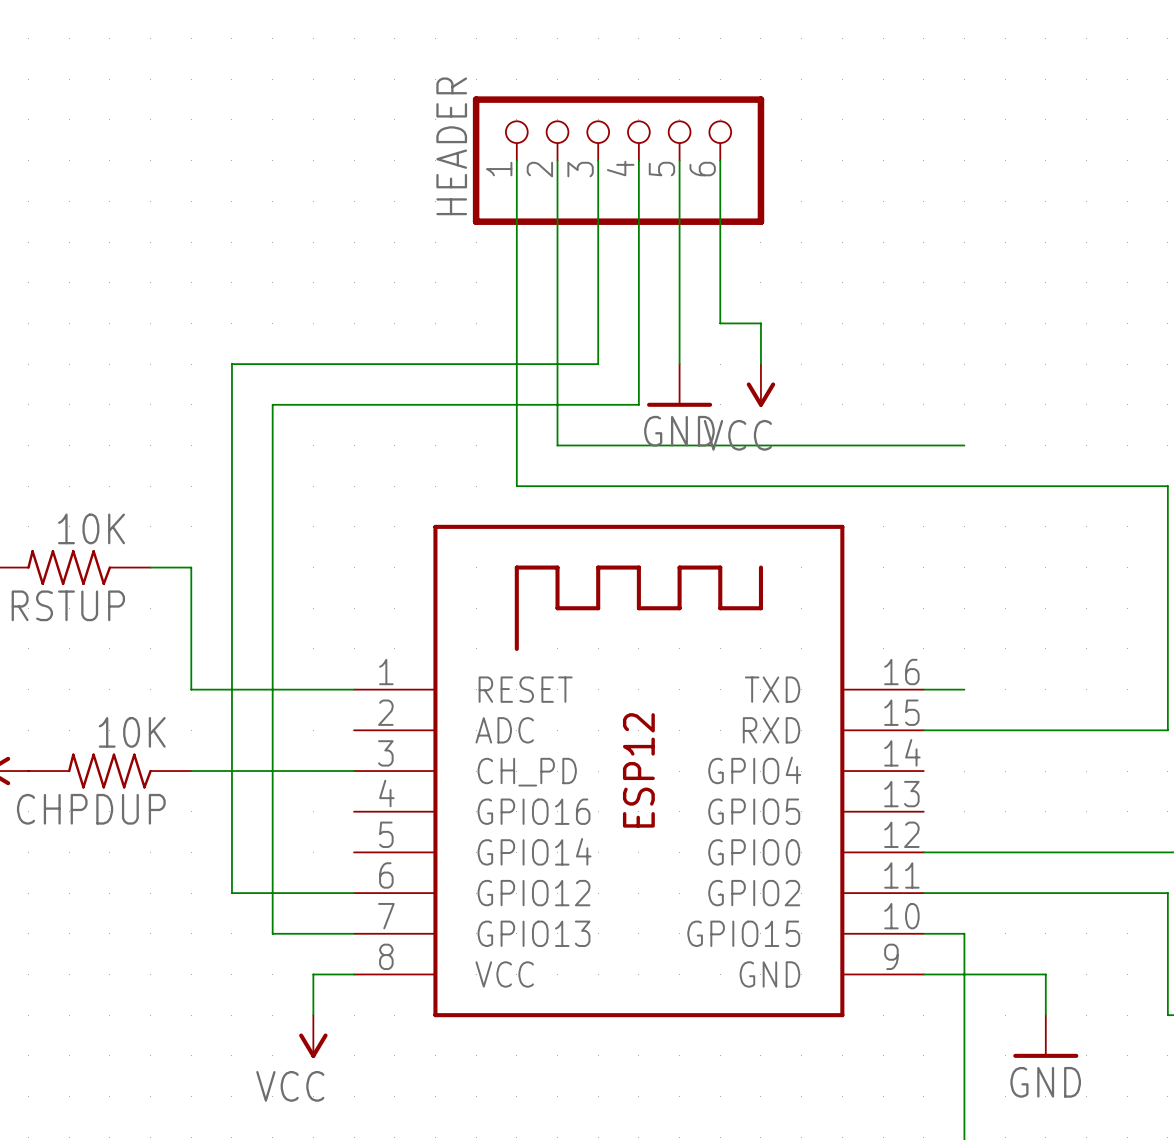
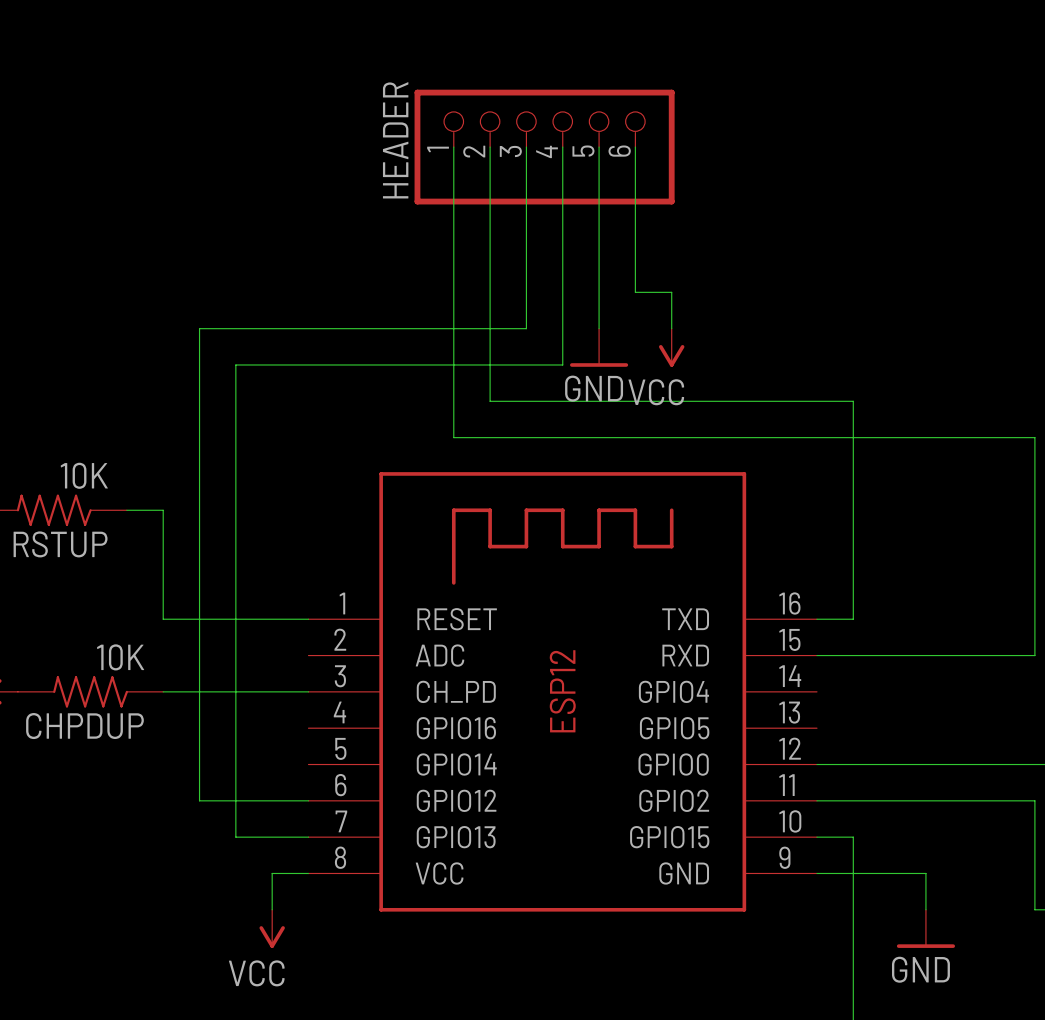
wire: none -> (853, 401) (853, 619)

